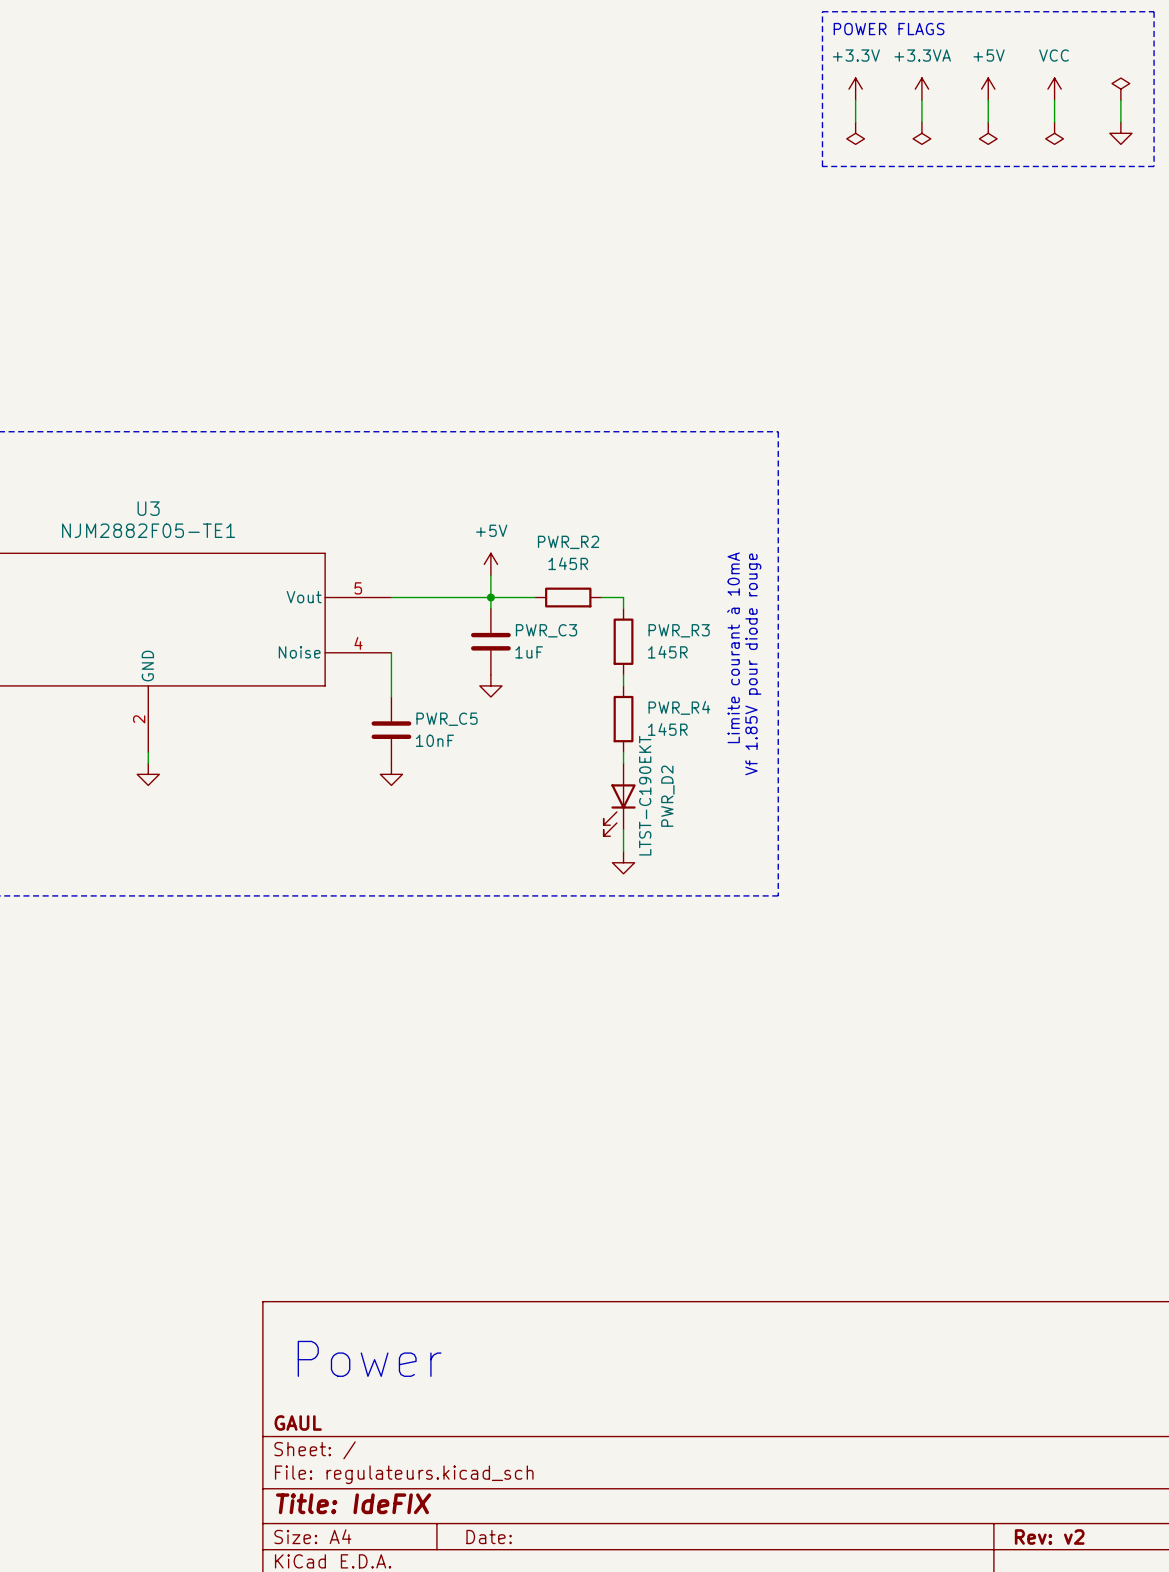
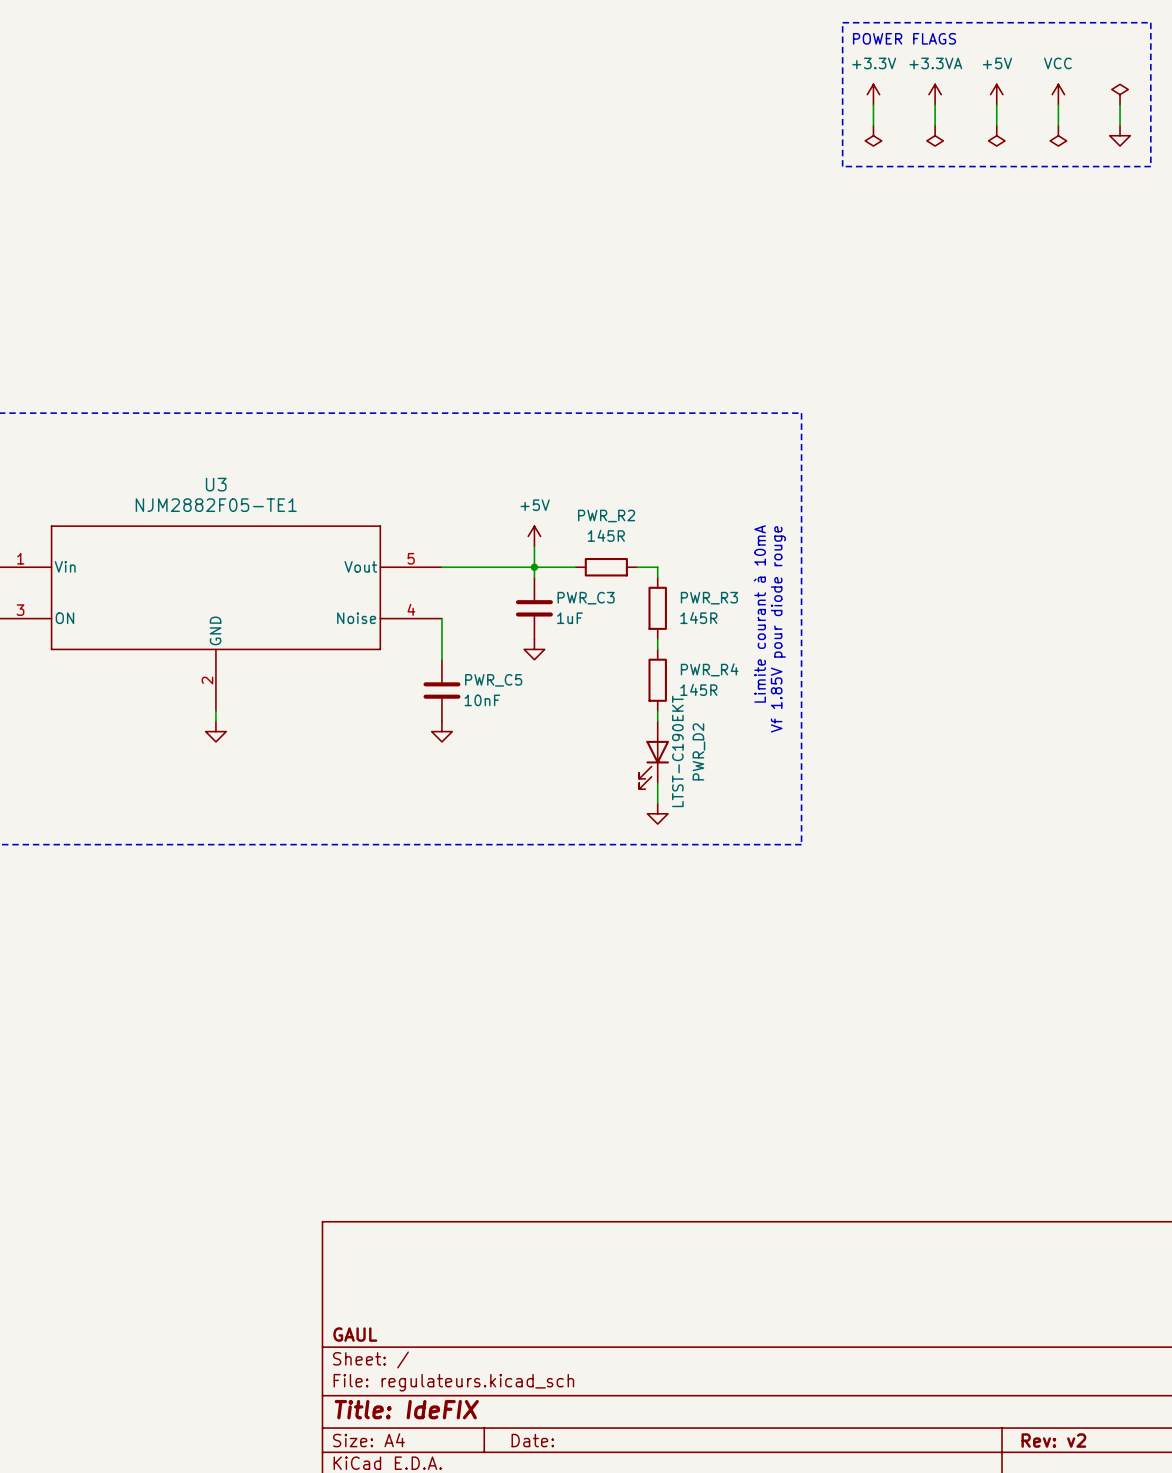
text: Power (369, 1358) -> none

